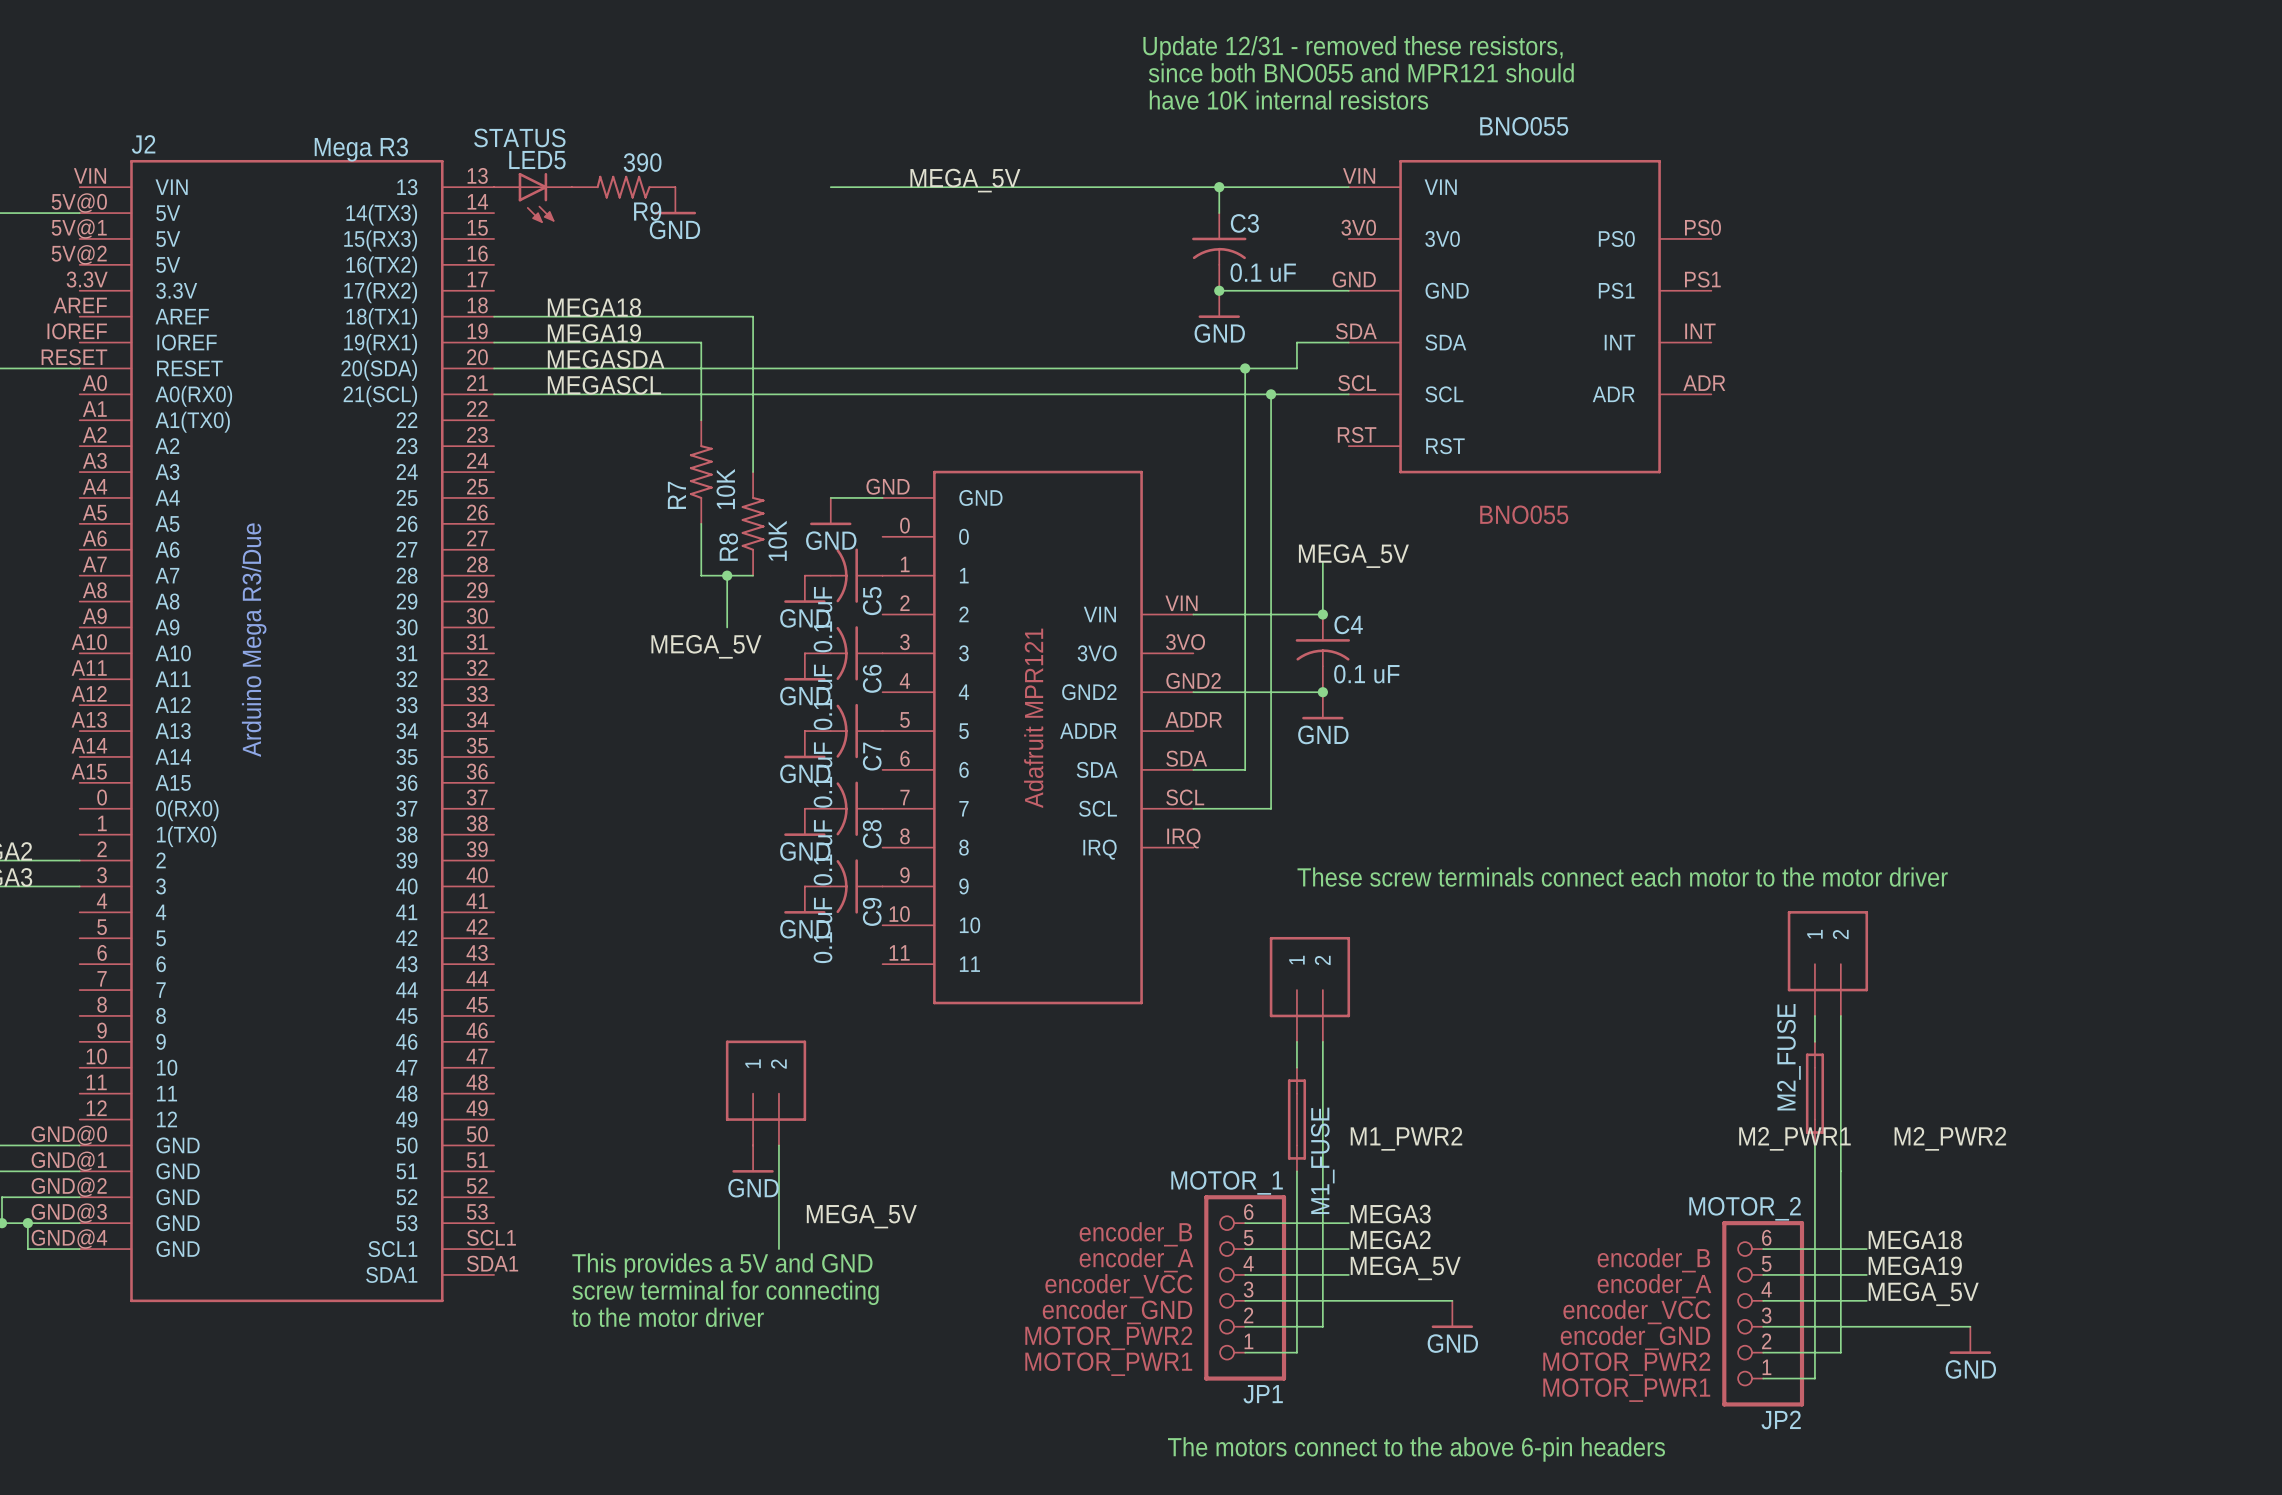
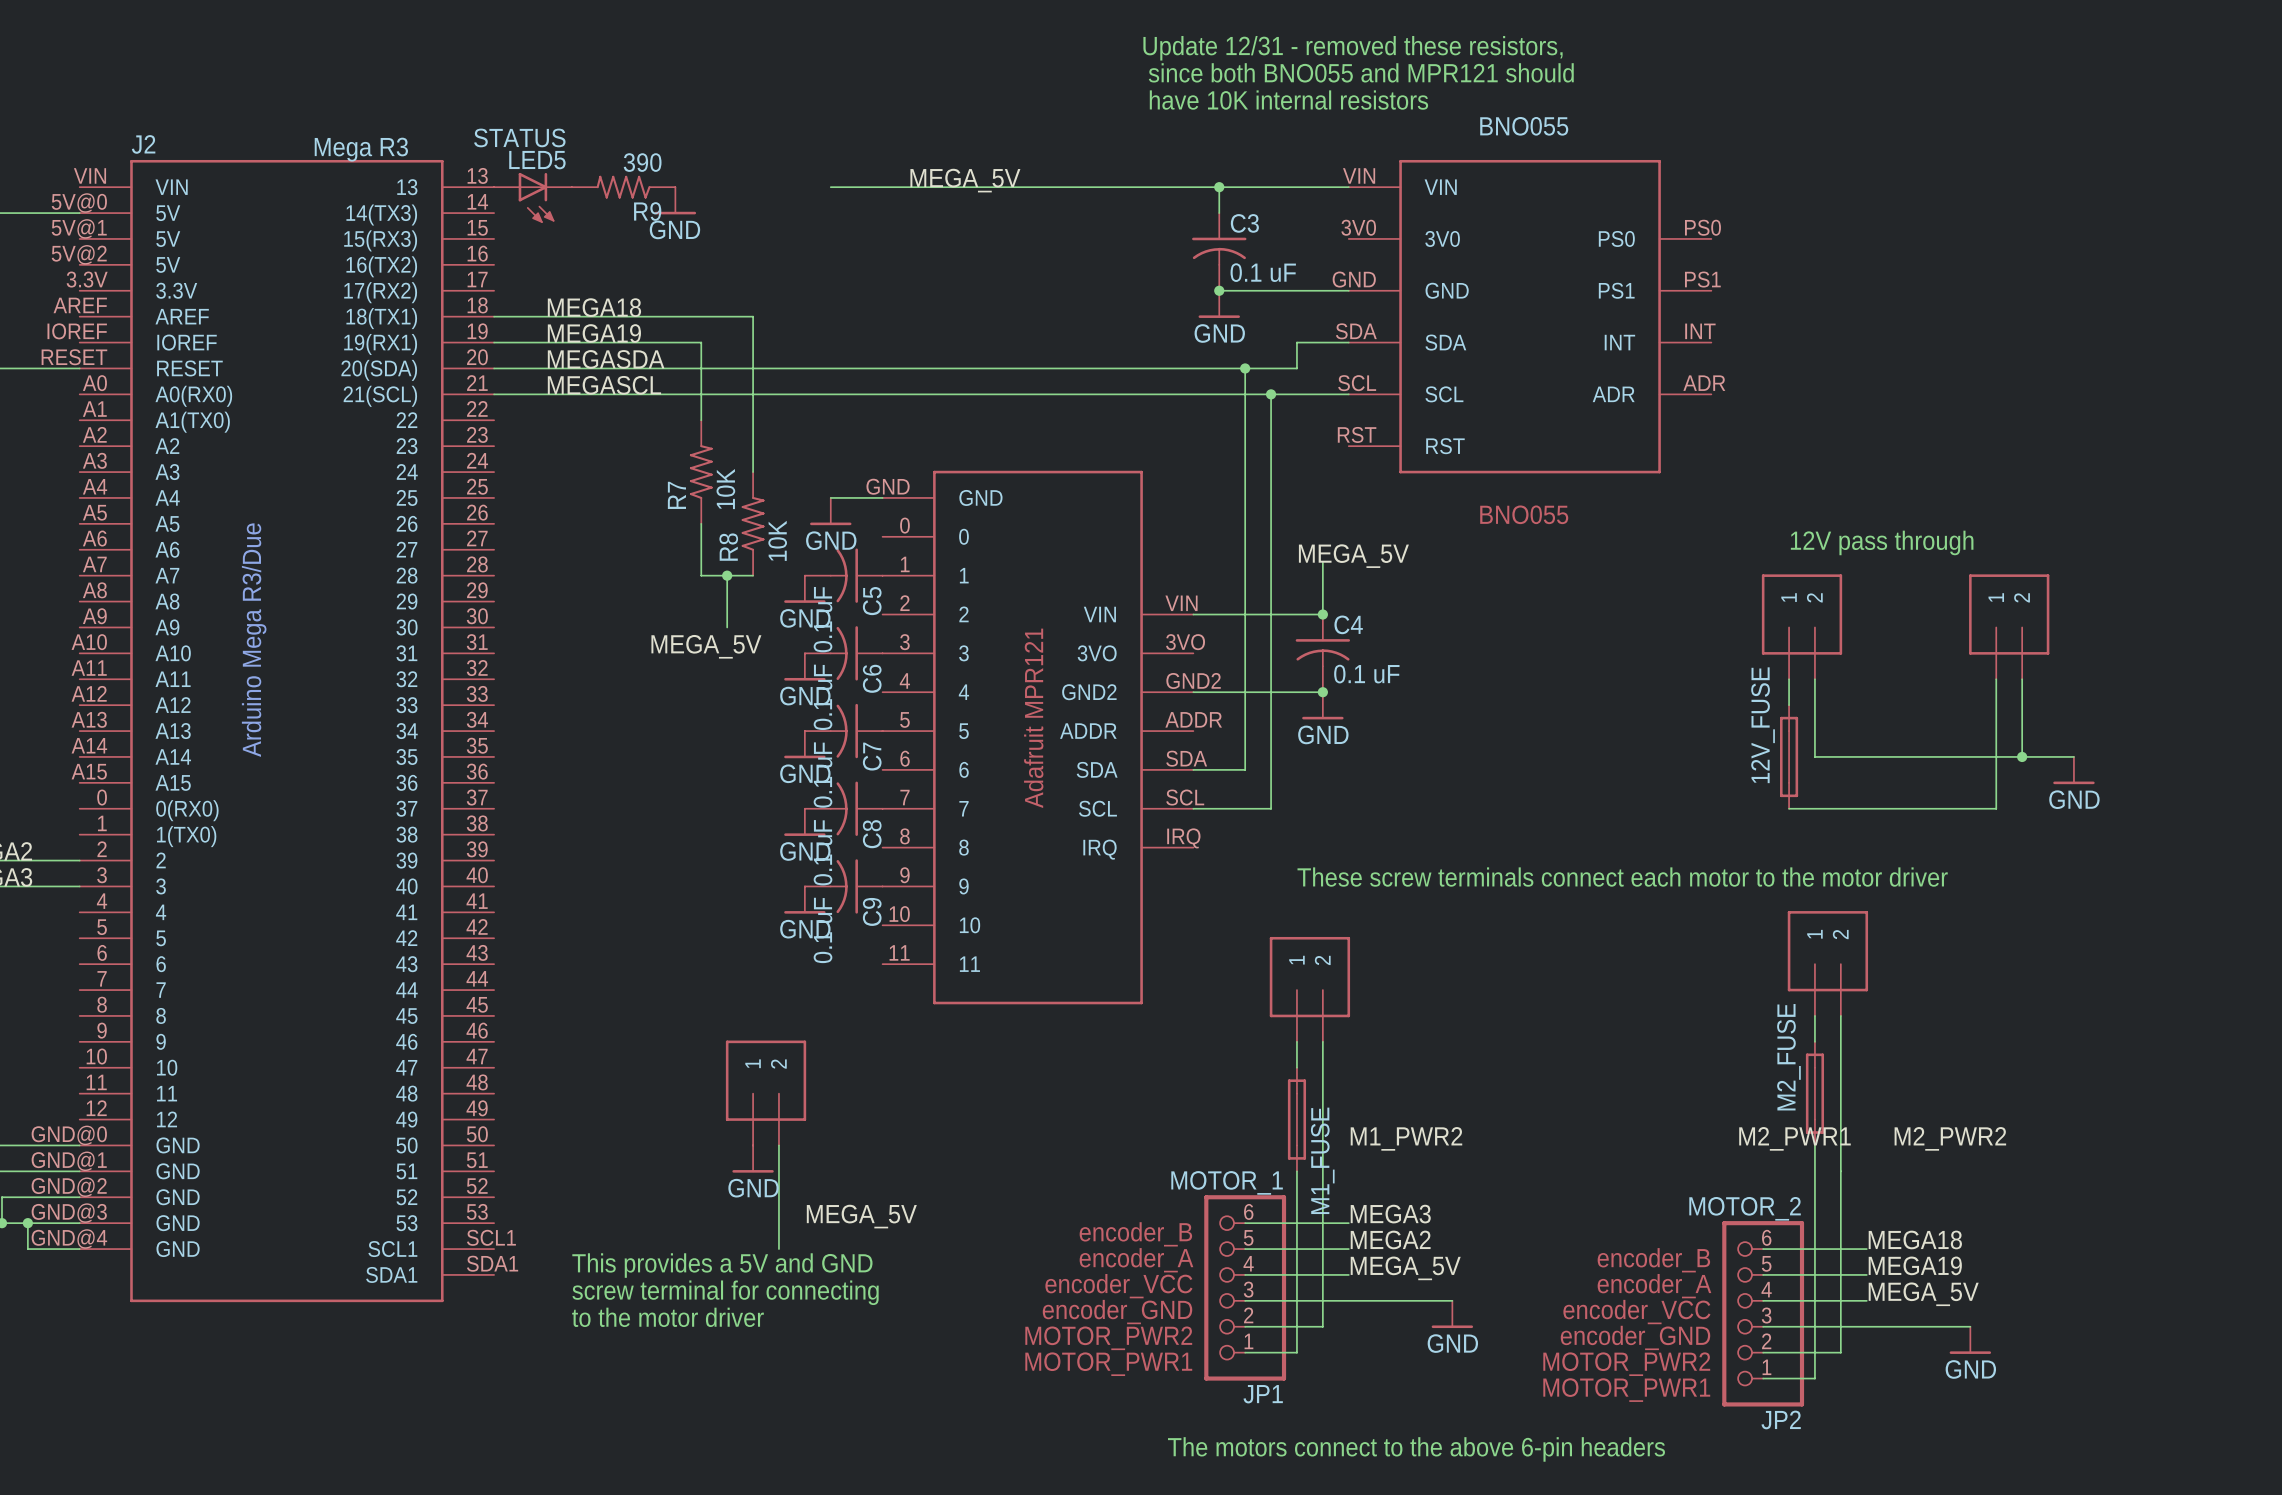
text: none -> 12V pass through (1882, 542)
part: none -> (1802, 626)
part: none -> (2009, 626)
wire: none -> (1789, 679) (1789, 705)
wire: none -> (1814, 679) (1814, 756) (2073, 756)
wire: none -> (1996, 679) (1996, 808) (1789, 808)
wire: none -> (2022, 679) (2022, 756)
12V_FUSE: none -> (1789, 756)
junction: none -> (2022, 756)
power symbol: none -> GND (2073, 770)

